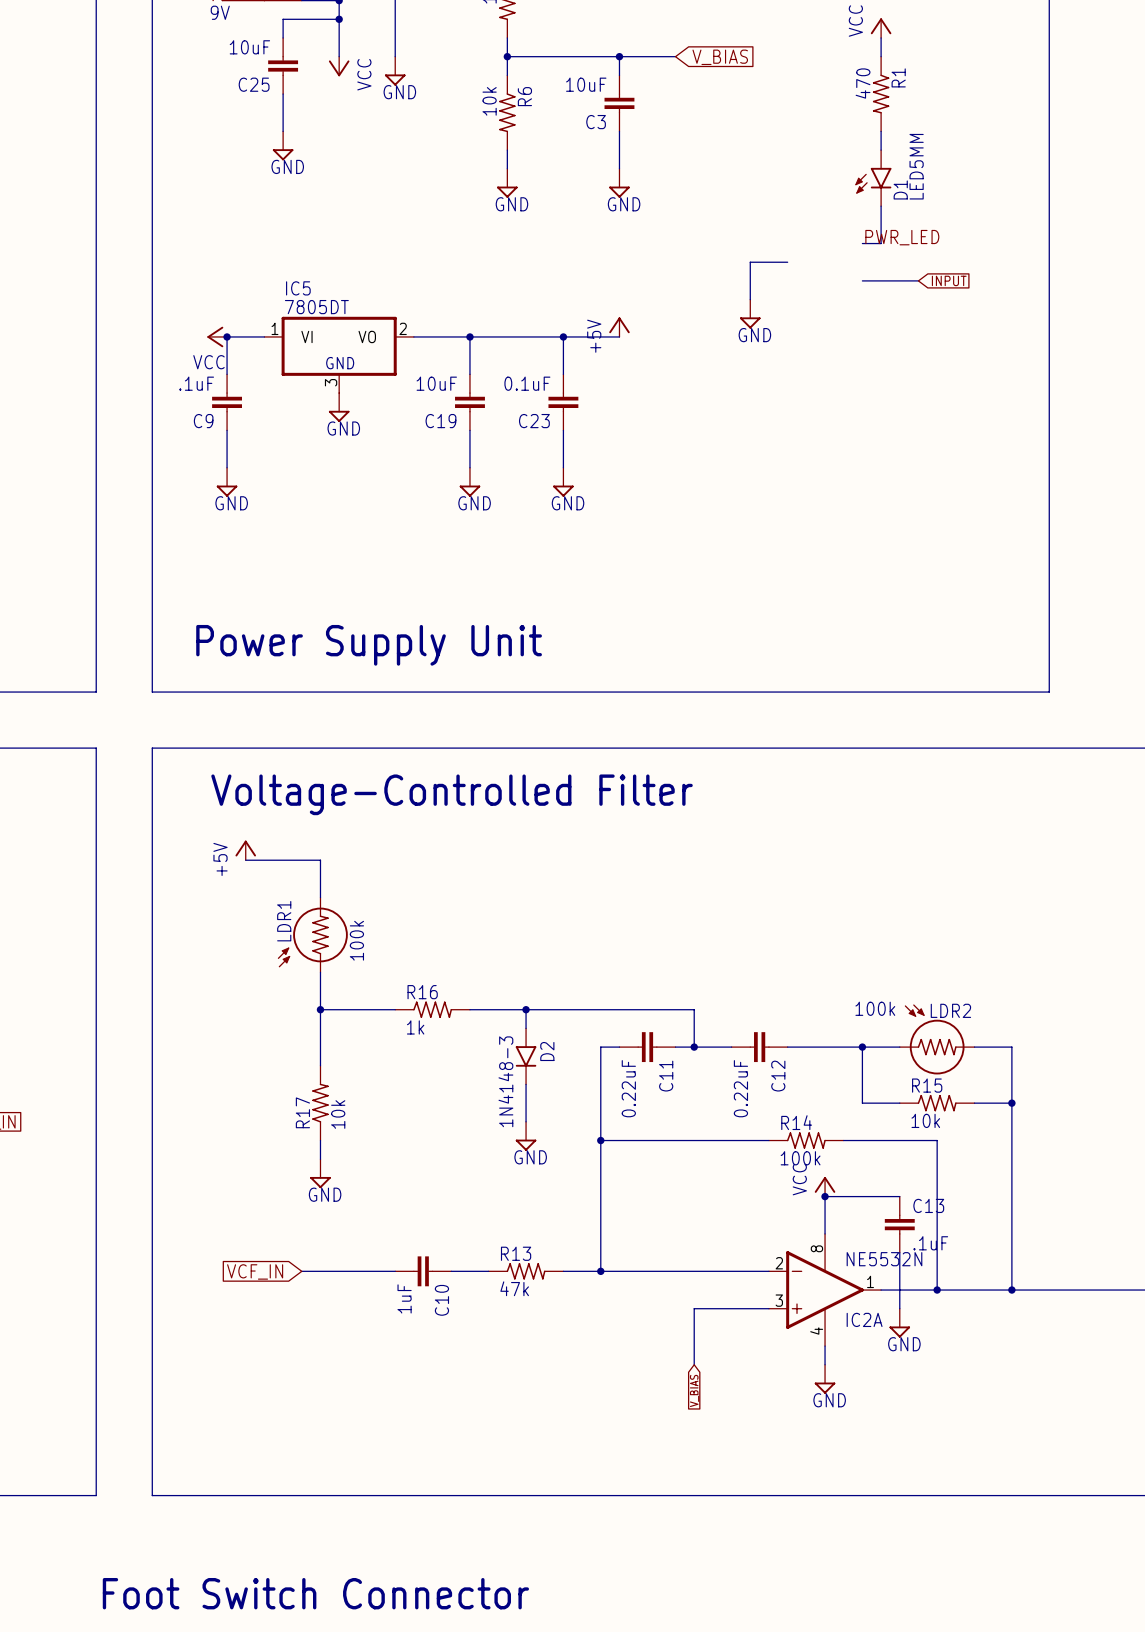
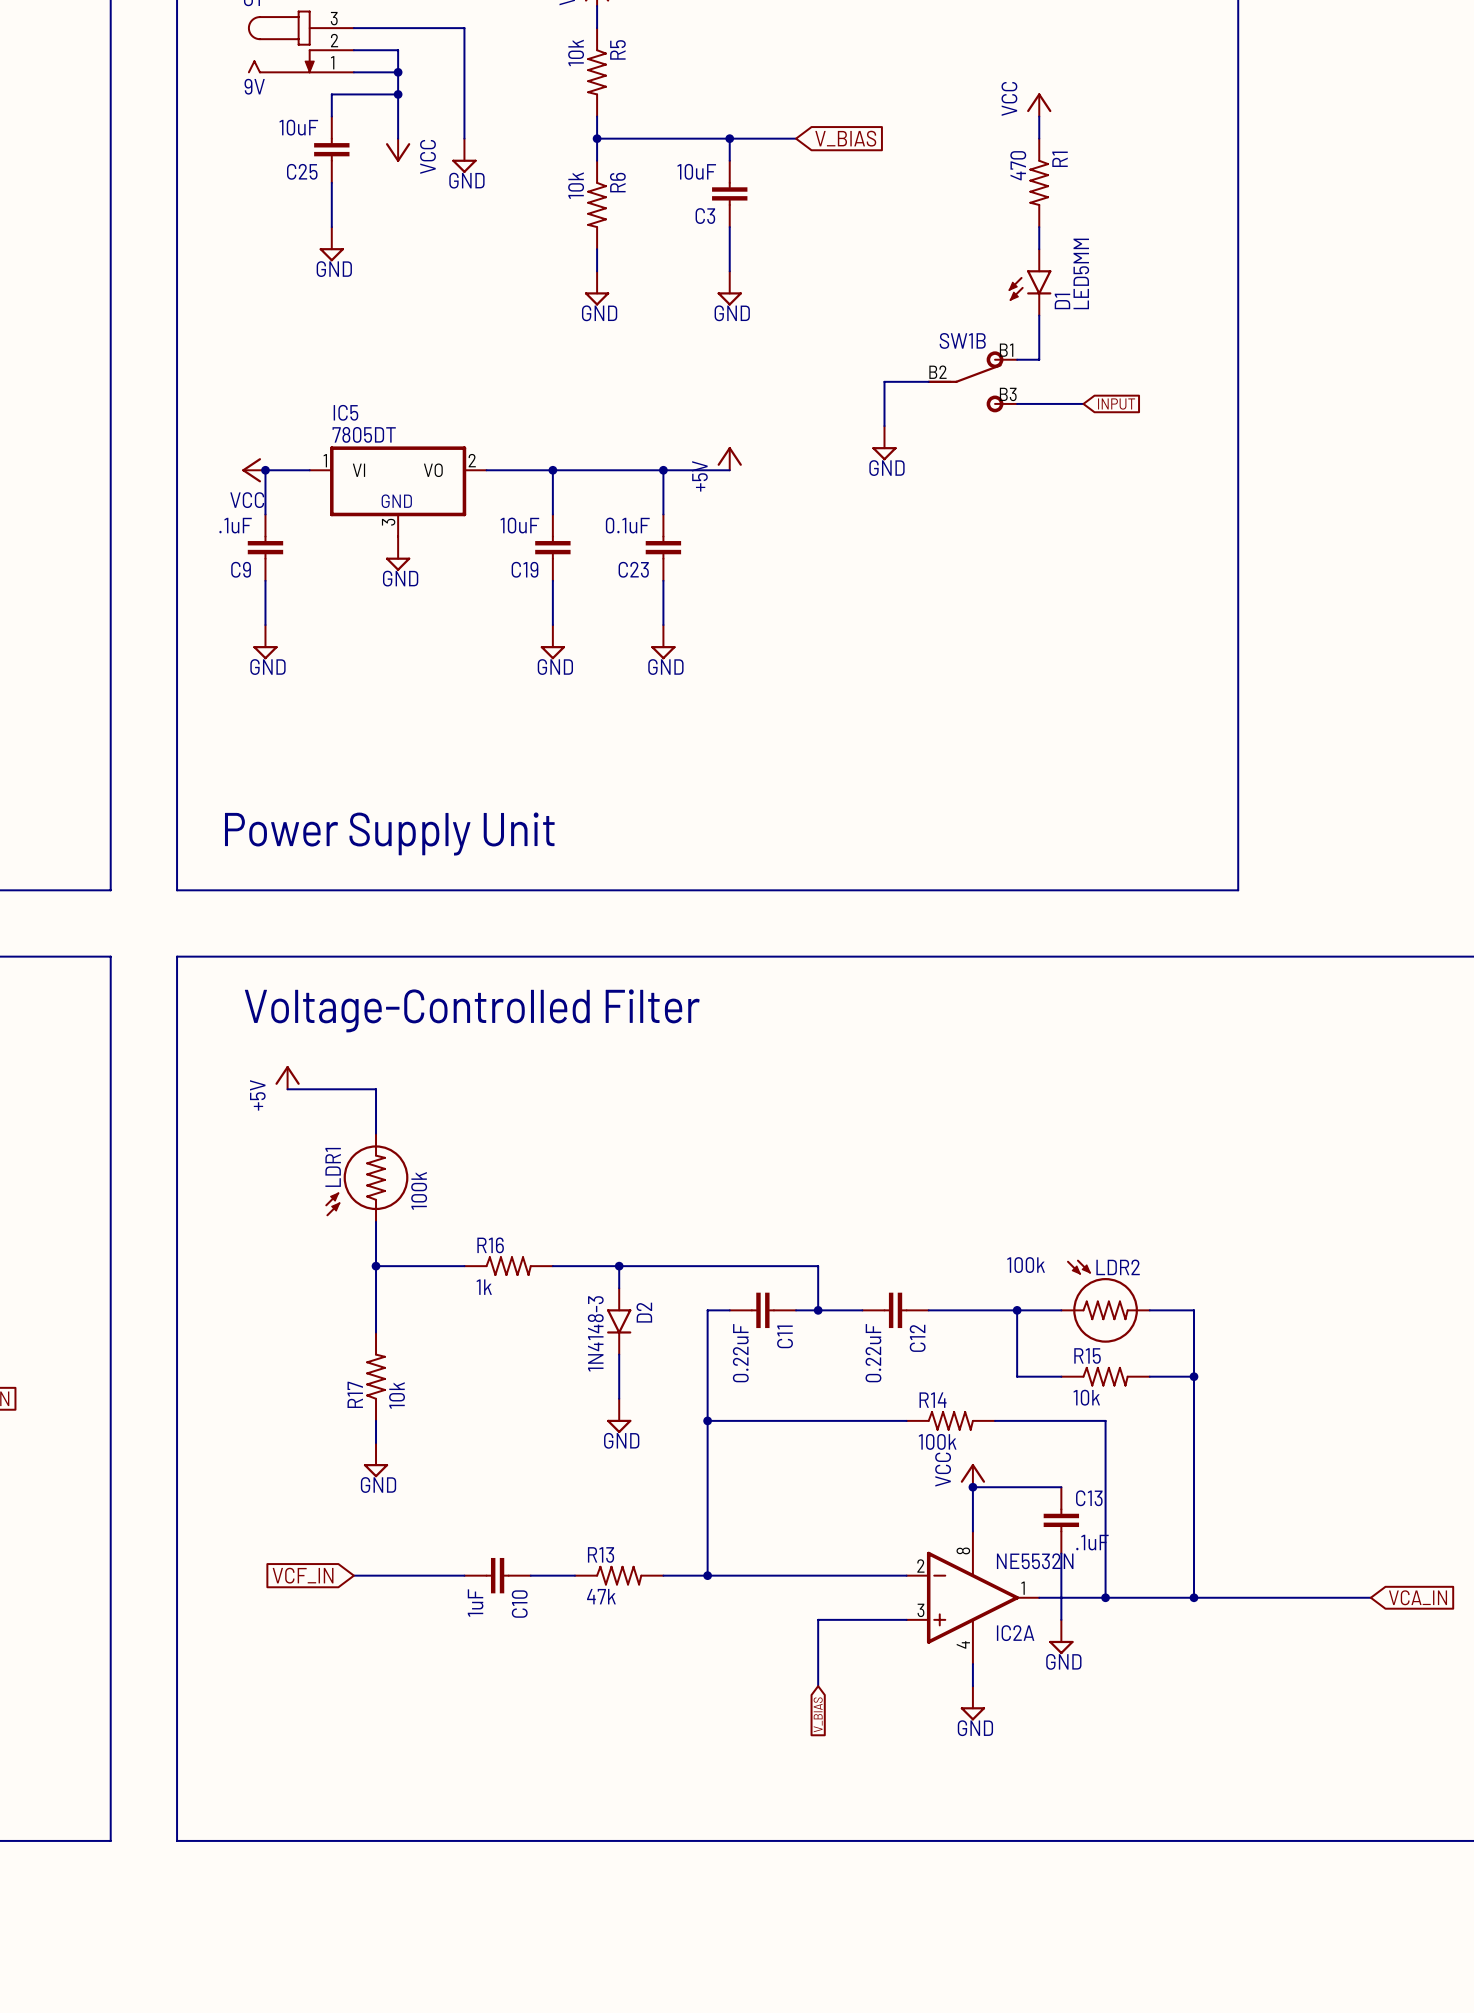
label: PWR_LED (902, 237) -> none
SW1B: none -> (972, 381)
text: Foot Switch Connector (315, 1593) -> none

